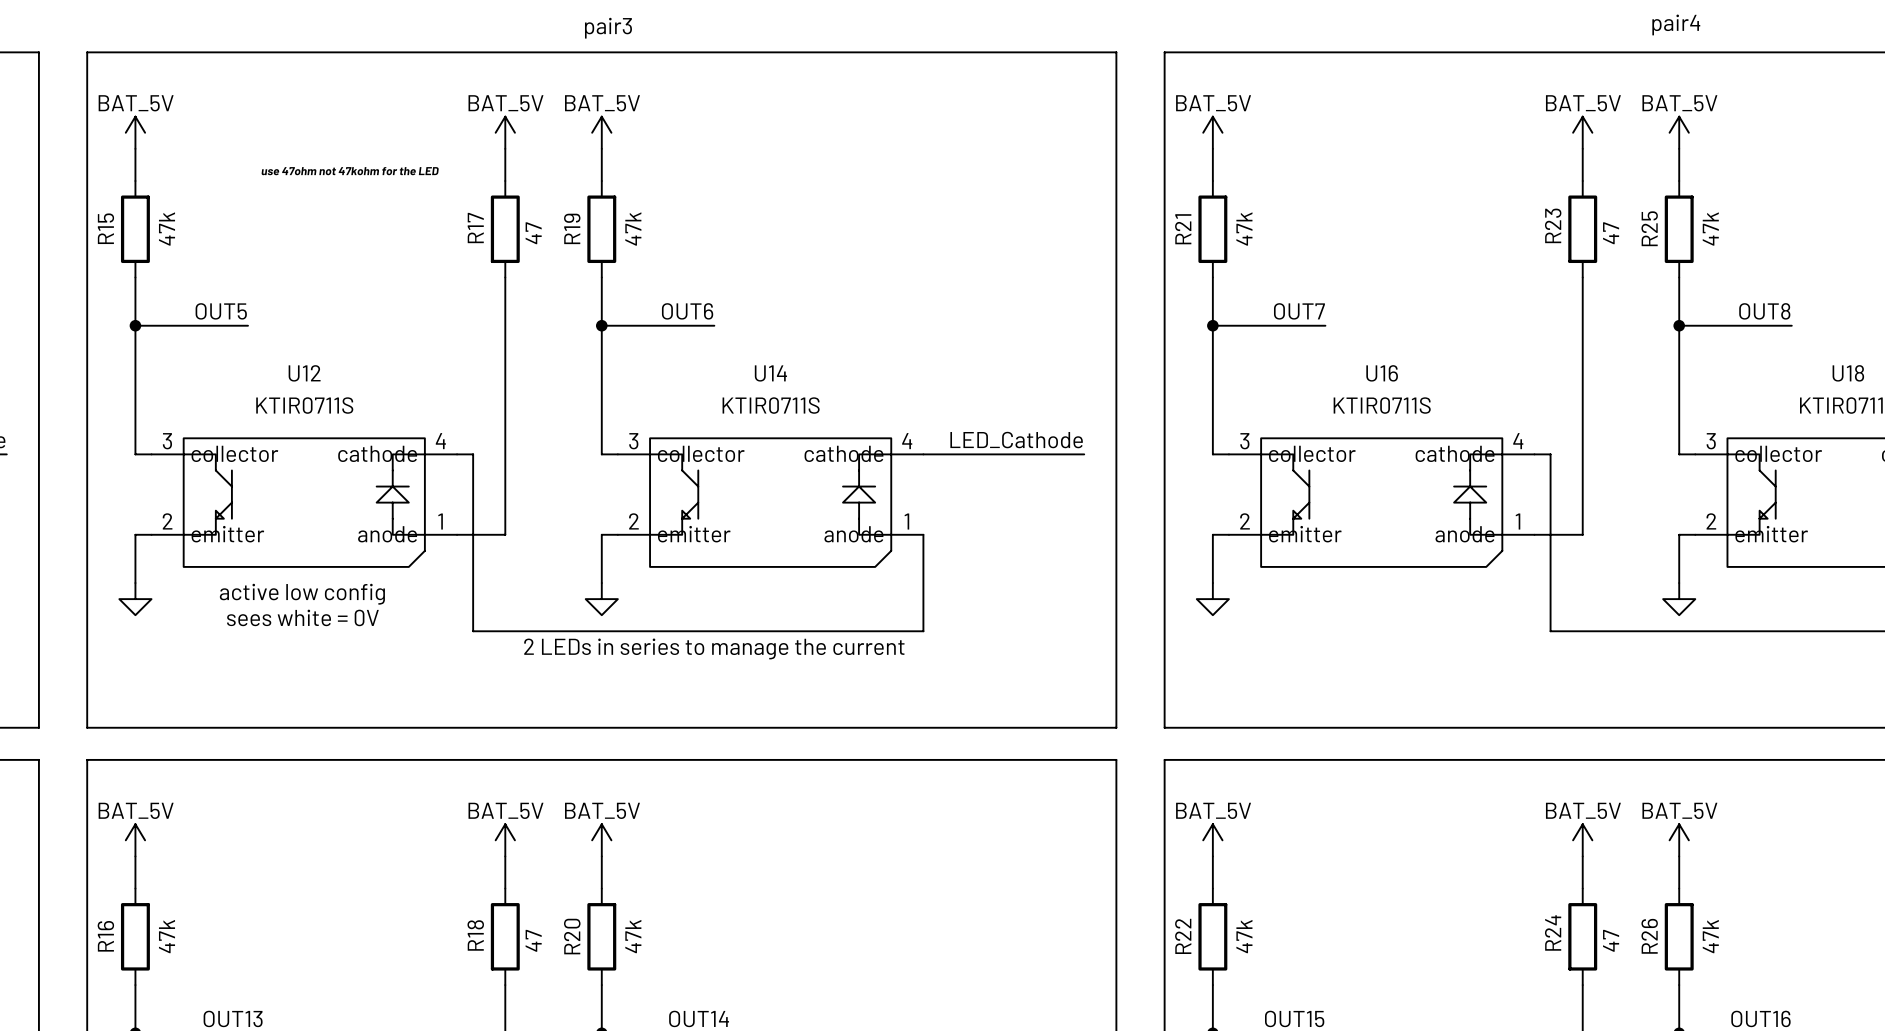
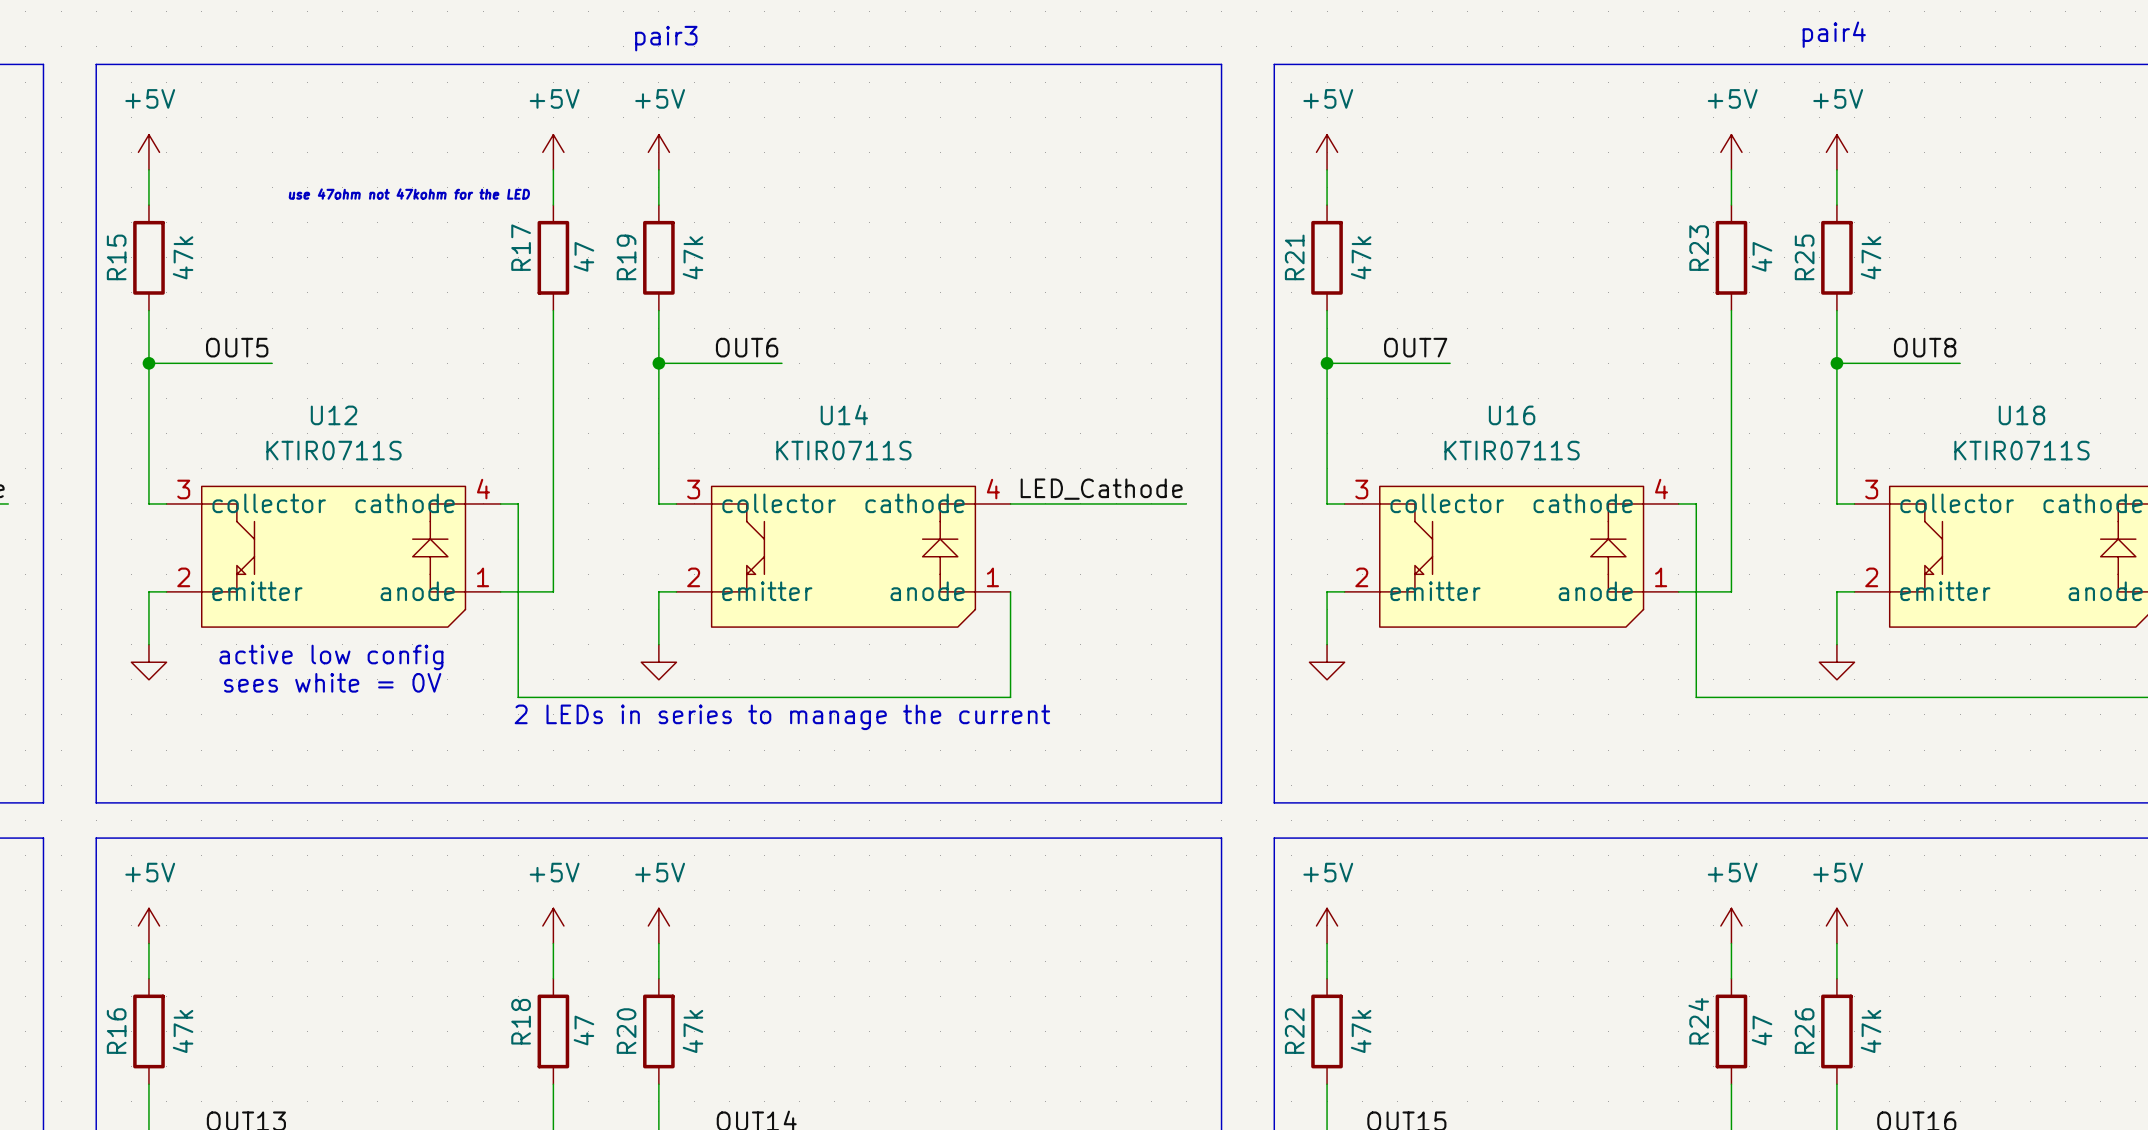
power symbol: BAT_5V (135, 132) -> +5V (148, 152)
power symbol: BAT_5V (505, 132) -> +5V (553, 152)
power symbol: BAT_5V (601, 132) -> +5V (658, 152)
power symbol: BAT_5V (1212, 132) -> +5V (1327, 152)
power symbol: BAT_5V (1582, 132) -> +5V (1731, 152)
power symbol: BAT_5V (1679, 132) -> +5V (1836, 152)
power symbol: BAT_5V (135, 840) -> +5V (148, 925)
power symbol: BAT_5V (505, 840) -> +5V (553, 925)
power symbol: BAT_5V (601, 840) -> +5V (658, 925)
power symbol: BAT_5V (1212, 840) -> +5V (1327, 925)
power symbol: BAT_5V (1582, 840) -> +5V (1731, 925)
power symbol: BAT_5V (1679, 840) -> +5V (1836, 925)

